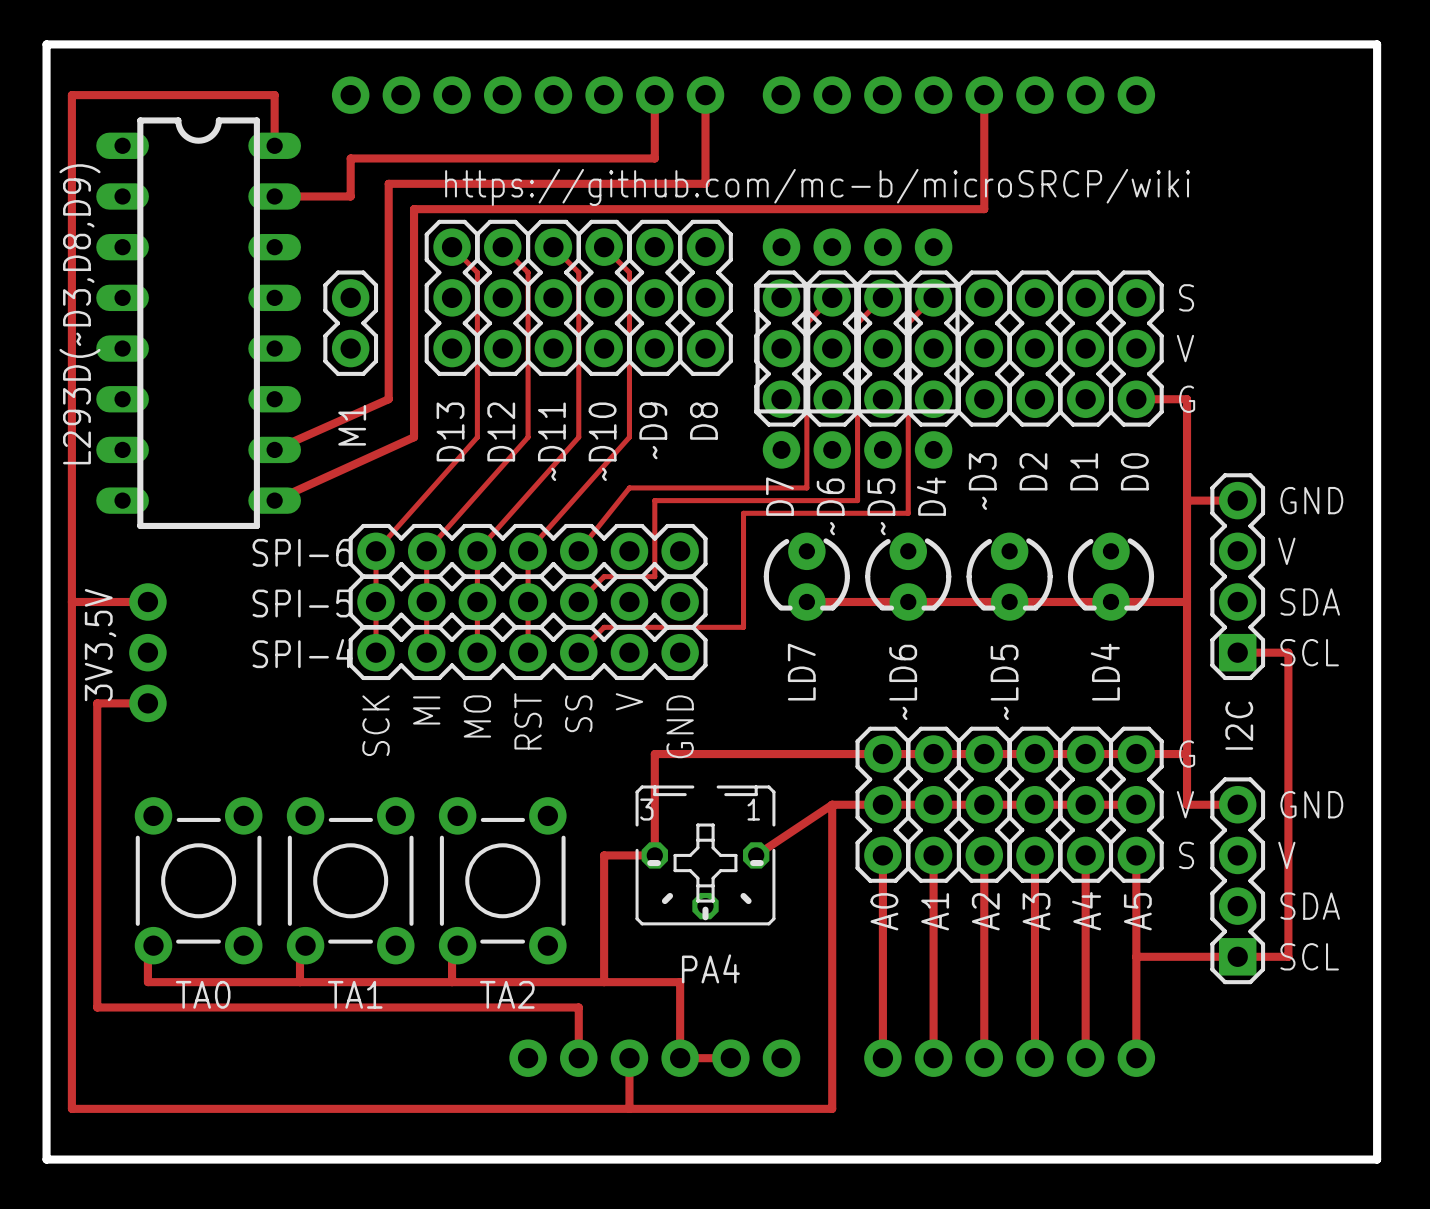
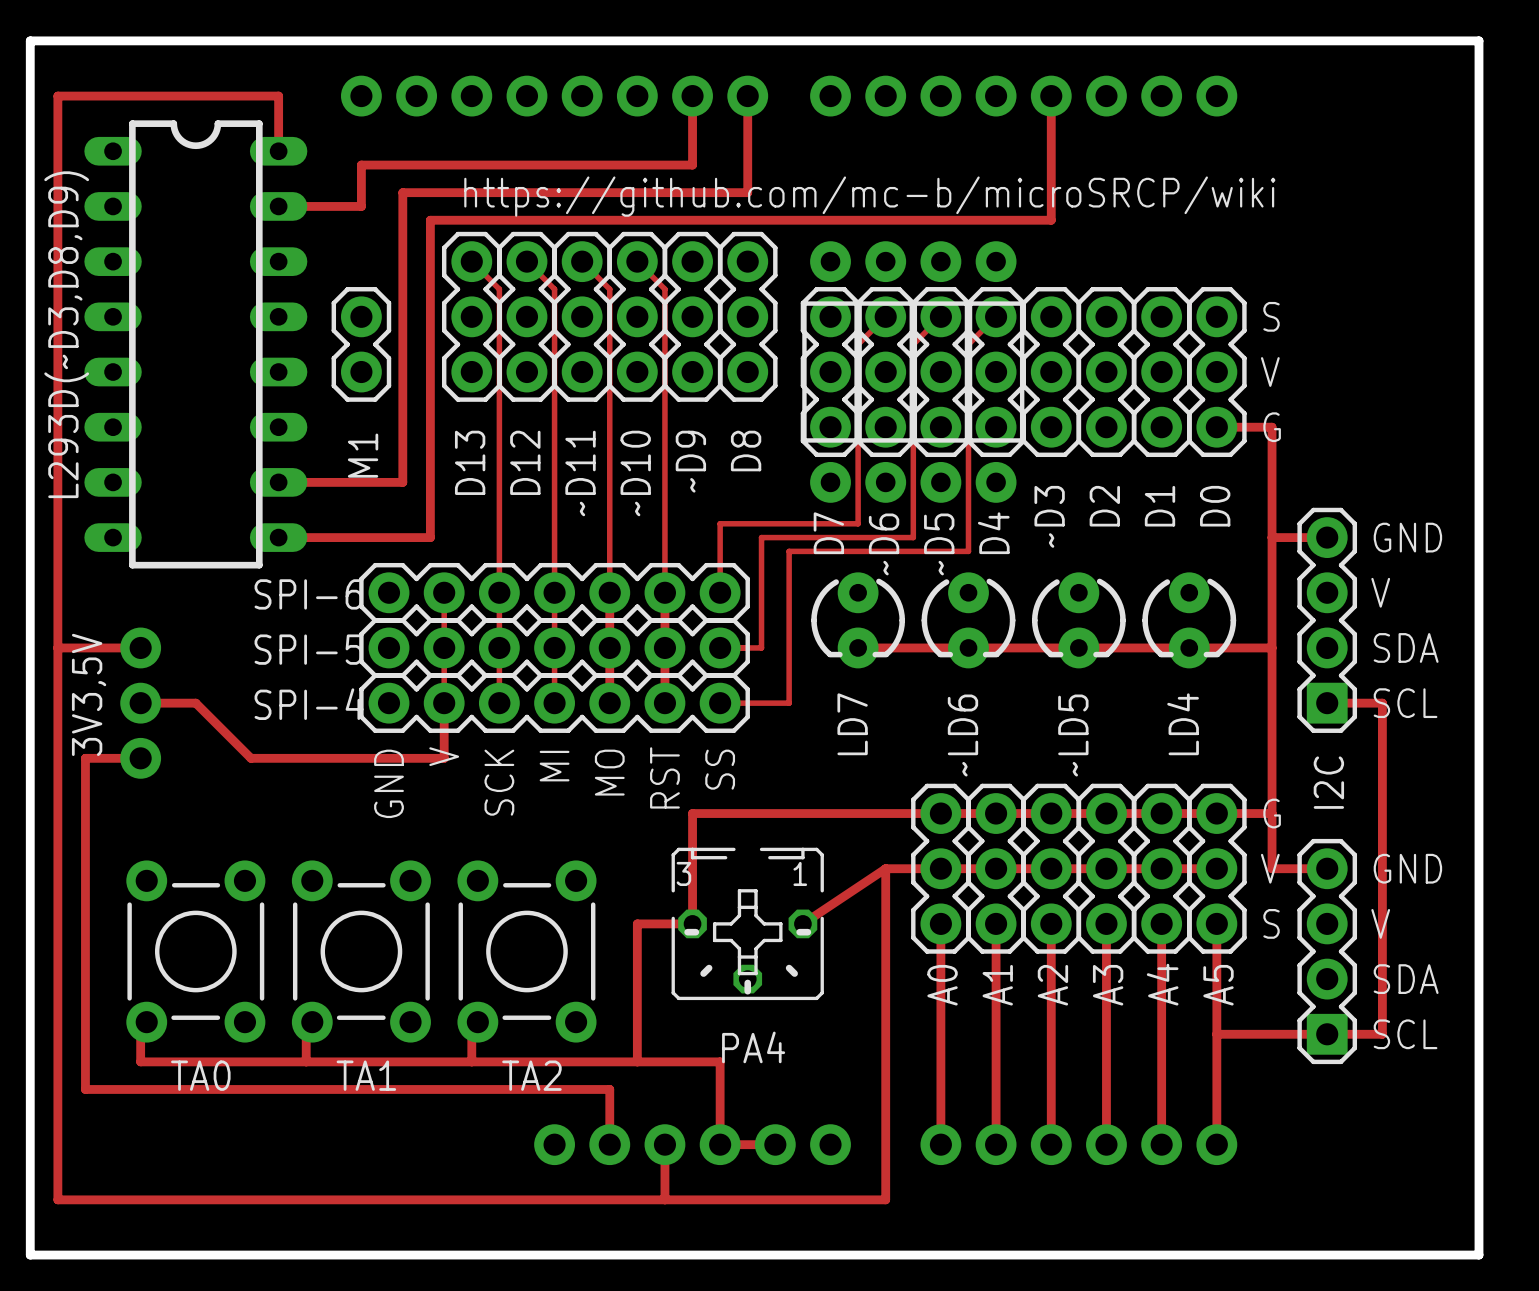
track: (388, 399) (274, 449) -> (402, 427) (402, 482) (278, 482)
track: (414, 437) (274, 500) -> (430, 468) (430, 537) (278, 537)
track: (477, 437) (376, 551) (376, 652) -> none
track: (528, 437) (426, 551) -> (554, 468) (554, 592)
track: (578, 437) (477, 551) -> (499, 468) (499, 592)
track: none -> (609, 468) (609, 703)
track: (629, 437) (528, 551) -> (664, 468) (664, 703)
track: (680, 487) (629, 487) (578, 551) -> (720, 523) (720, 592)
track: (718, 500) (654, 500) (654, 576) (604, 576) (578, 601) -> (761, 537) (761, 647) (720, 647)
track: (743, 627) (604, 627) (578, 652) -> (789, 675) (789, 703) (720, 703)
track: none -> (140, 703) (195, 703) (251, 758) (444, 758) (444, 703)
text: V (629, 701) -> RST (664, 777)
text: MI (426, 710) -> V (444, 756)
text: SS (578, 713) -> MO (609, 772)
text: MO (477, 716) -> SCK (499, 782)
text: RST (528, 721) -> MI (554, 766)
text: SCK (376, 725) -> GND (389, 783)
text: GND (680, 726) -> SS (720, 769)

